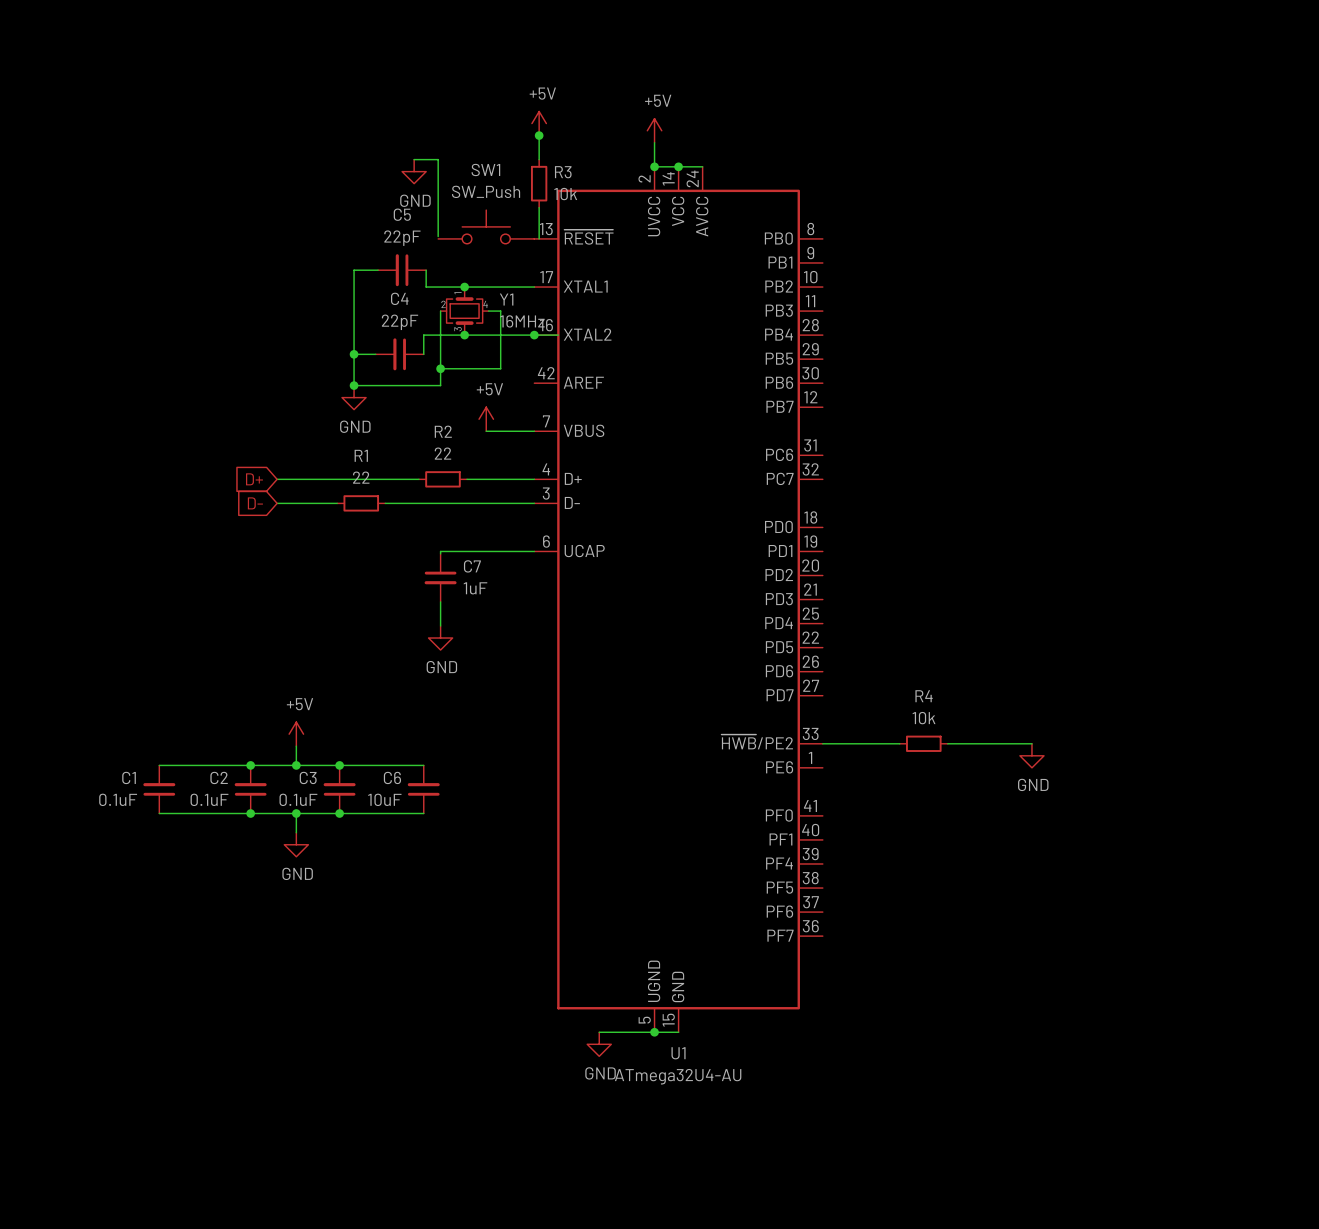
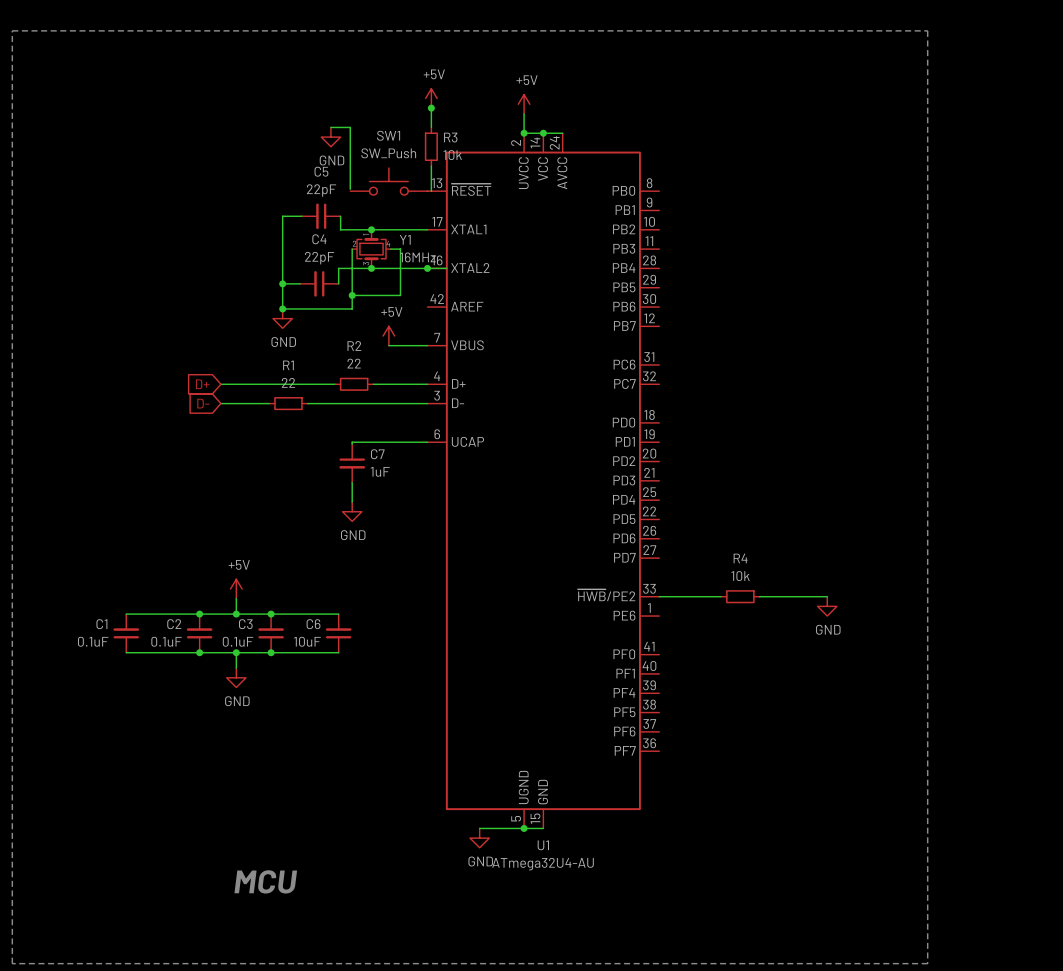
line: none -> (12, 30) (12, 963) (927, 963) (927, 30) (12, 30)
text: none -> MCU (265, 881)

